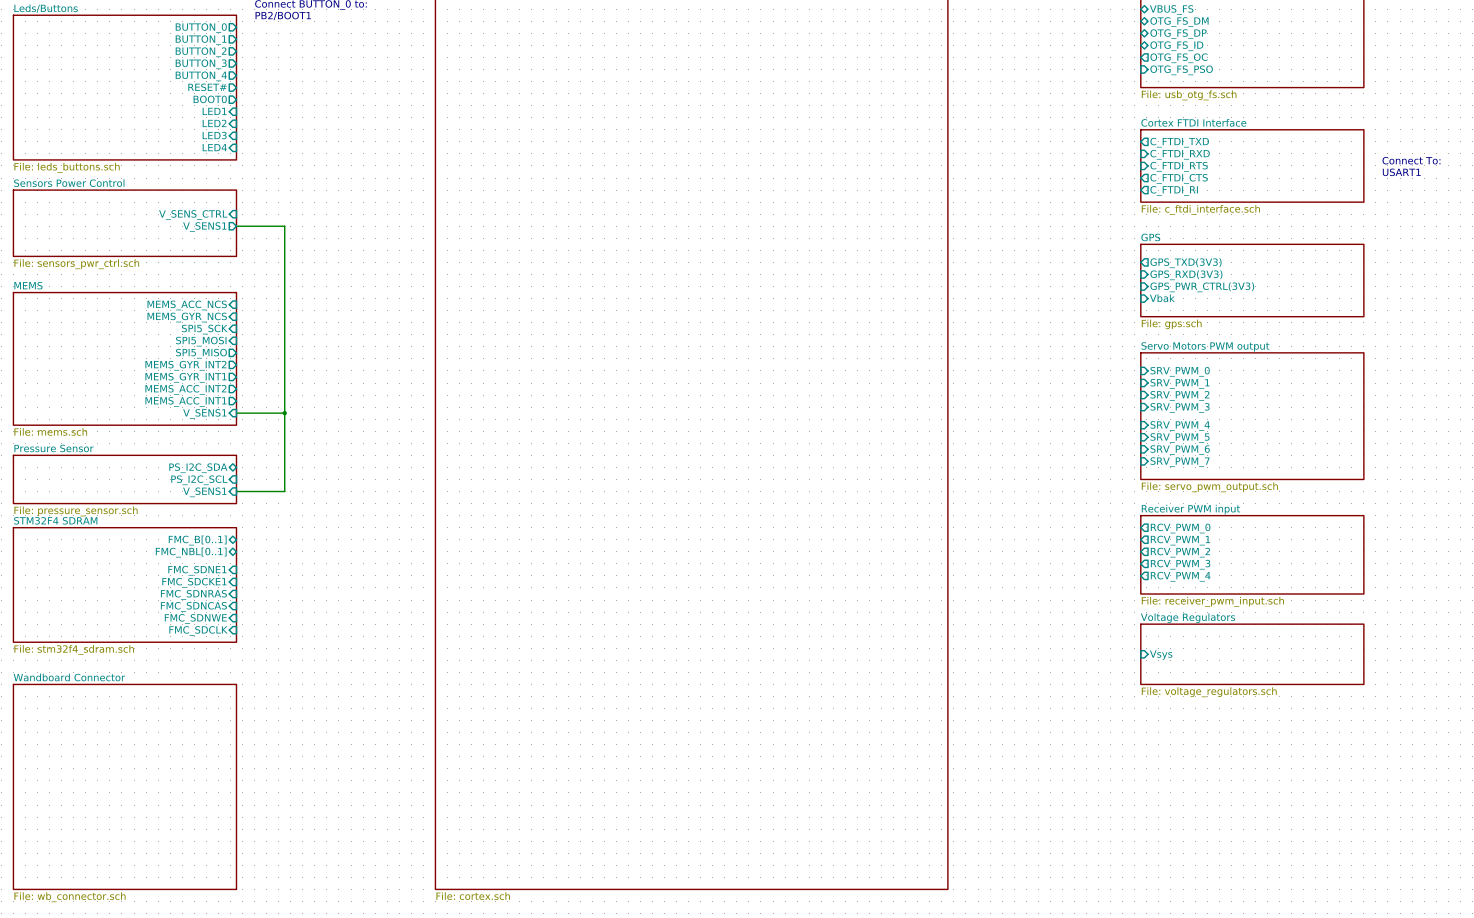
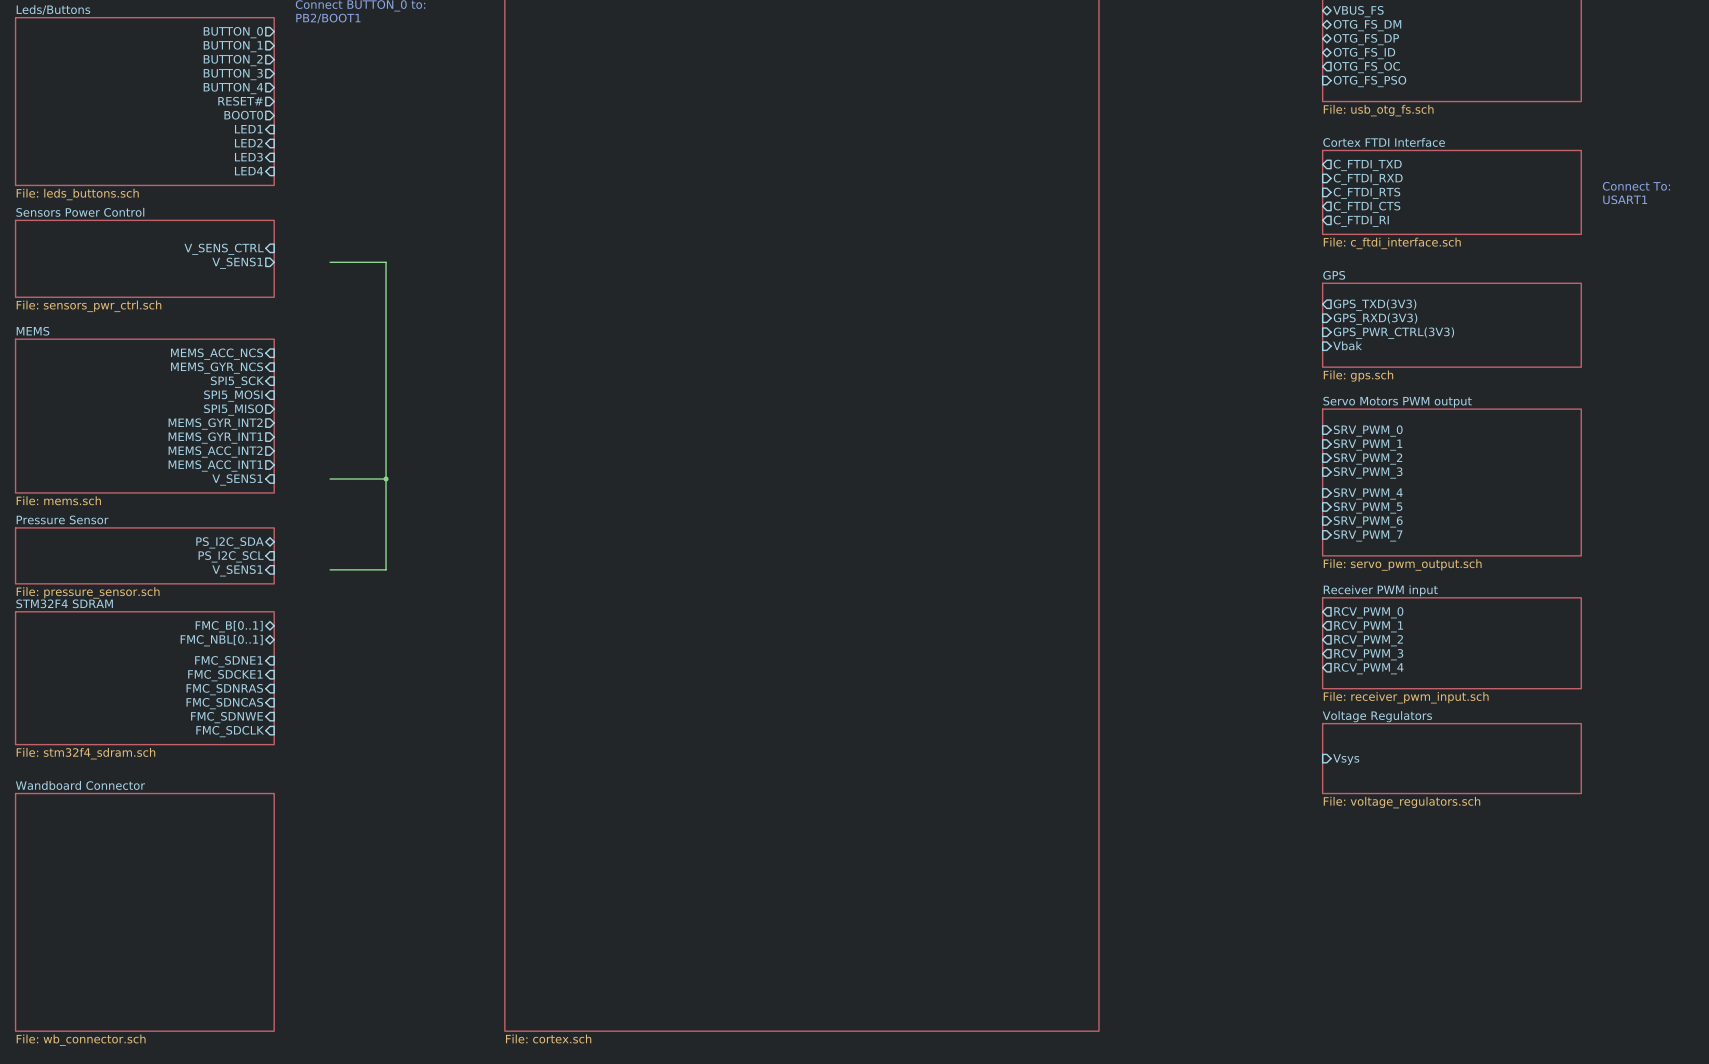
wire: (236, 226) (284, 226) (284, 491) (236, 491) -> (330, 262) (386, 262) (386, 569) (330, 569)
wire: (236, 413) (284, 413) -> (386, 479) (330, 479)
junction: (284, 413) -> none
junction: none -> (386, 479)

